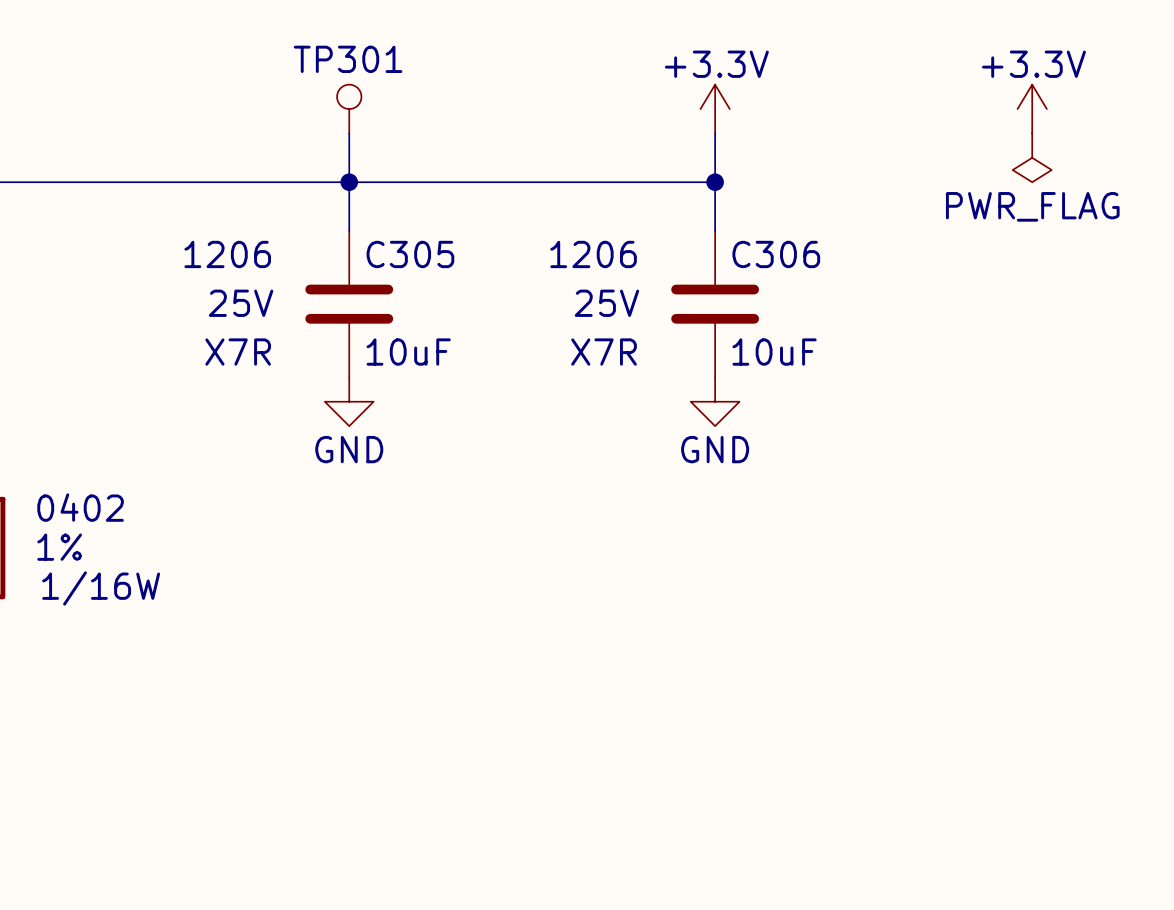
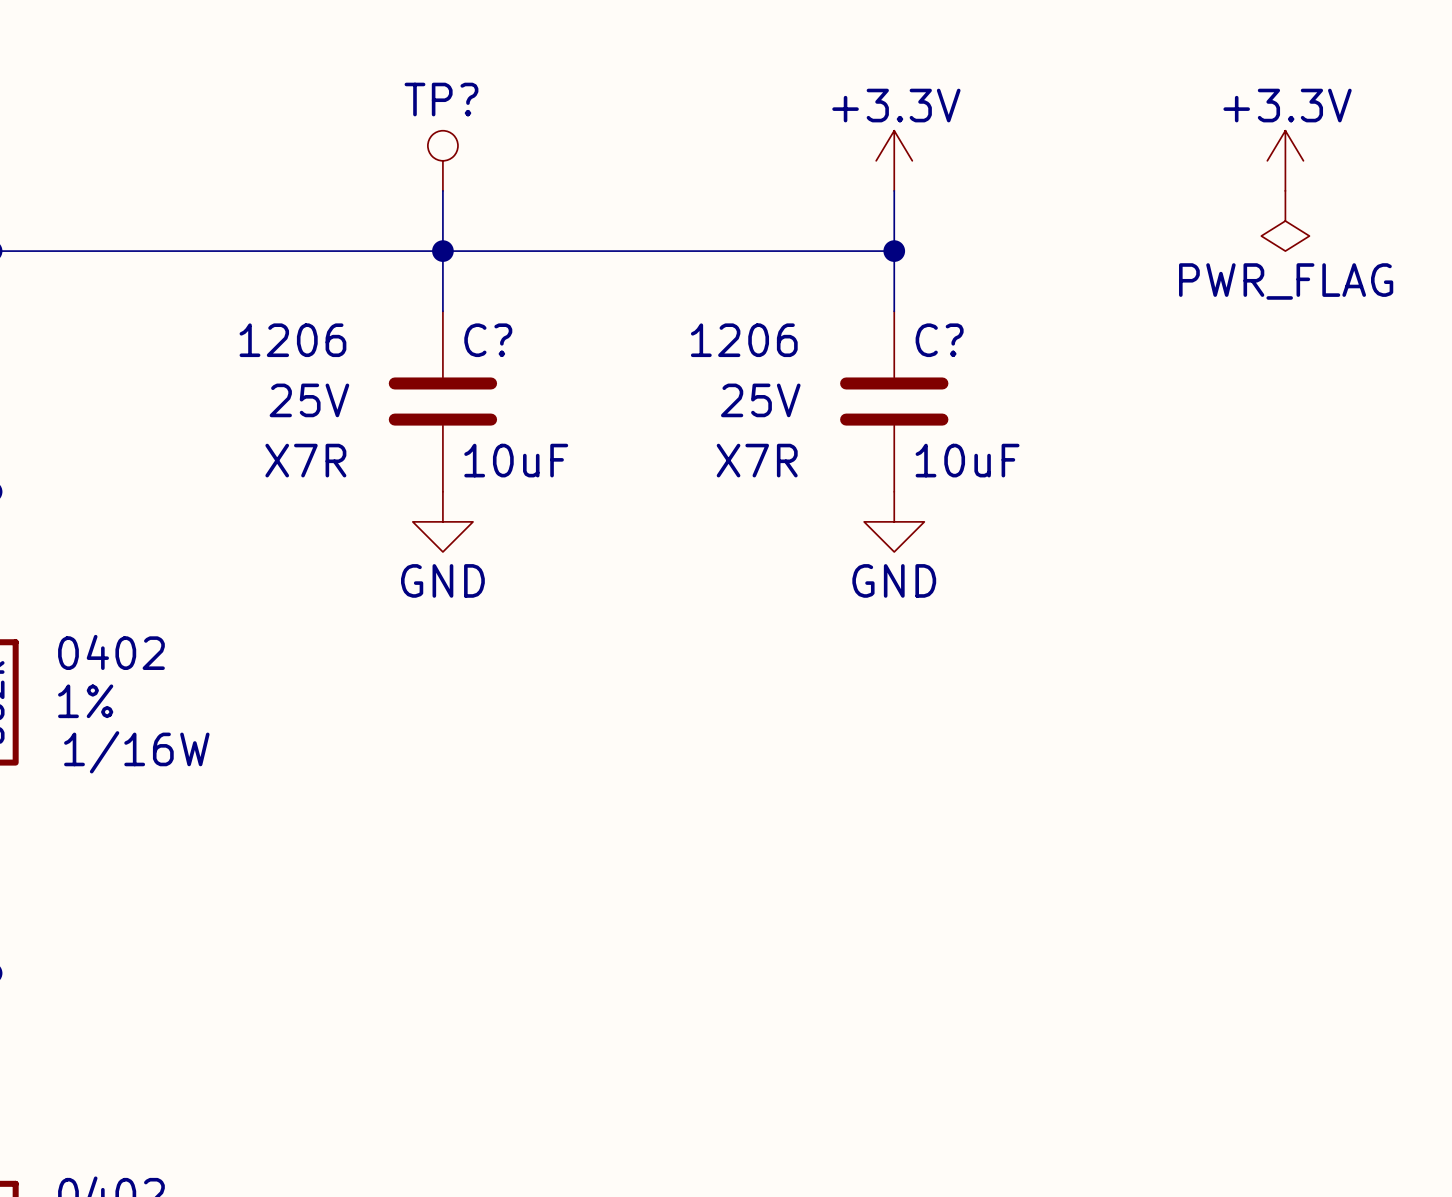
TP301 name: TP301 (348, 59) -> TP? (441, 99)
C305 name: C305 (410, 254) -> C? (488, 340)
C306 name: C306 (776, 254) -> C? (939, 340)

